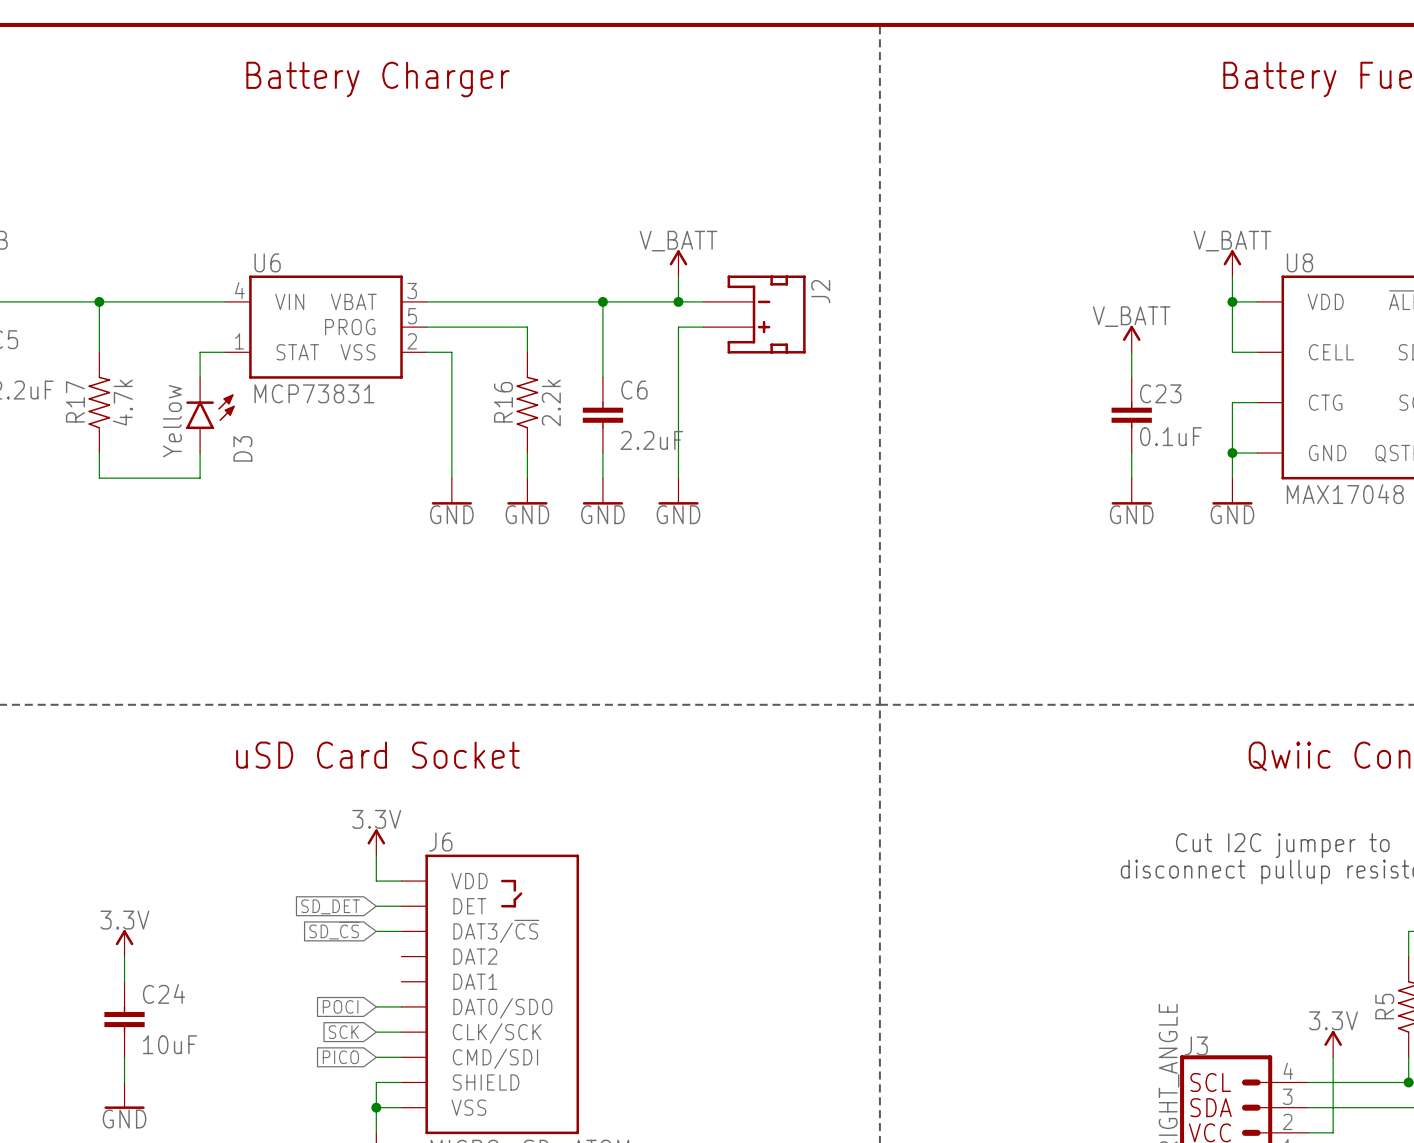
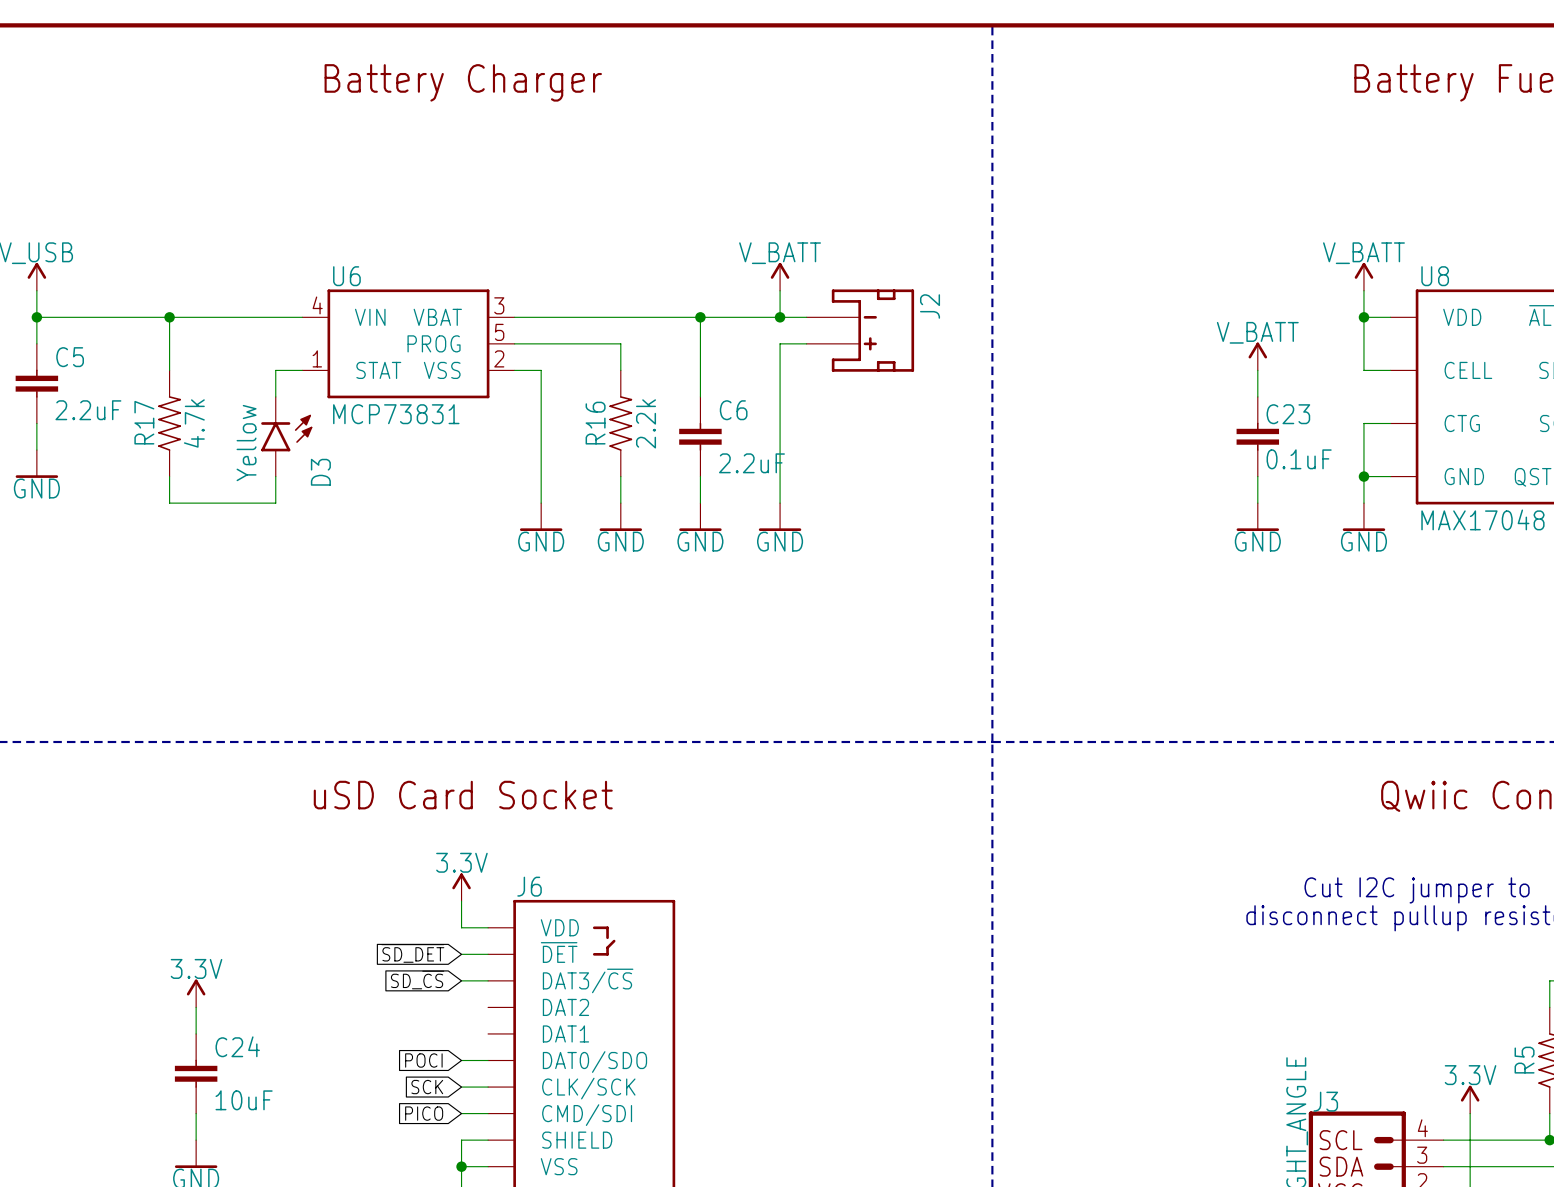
global label: SD_DET (330, 906) -> ~{SD_DET} (412, 953)
J6 pin name: DET (469, 906) -> ~{DET} (559, 952)

